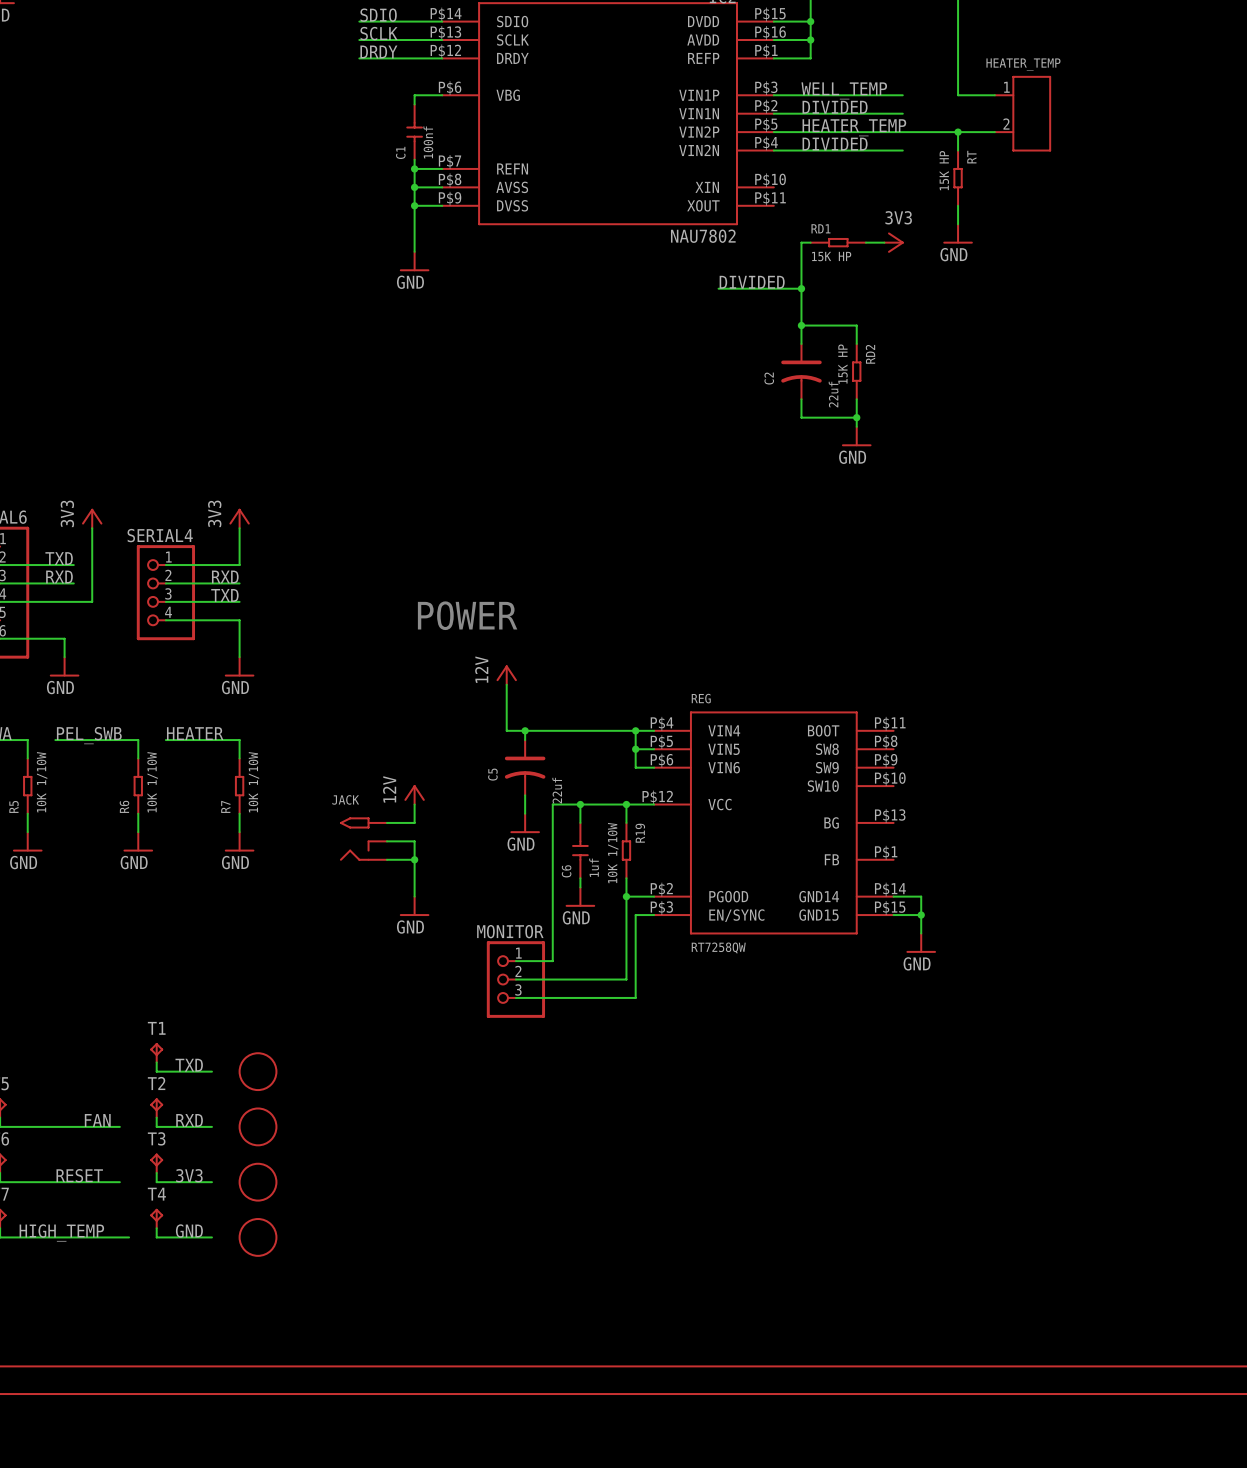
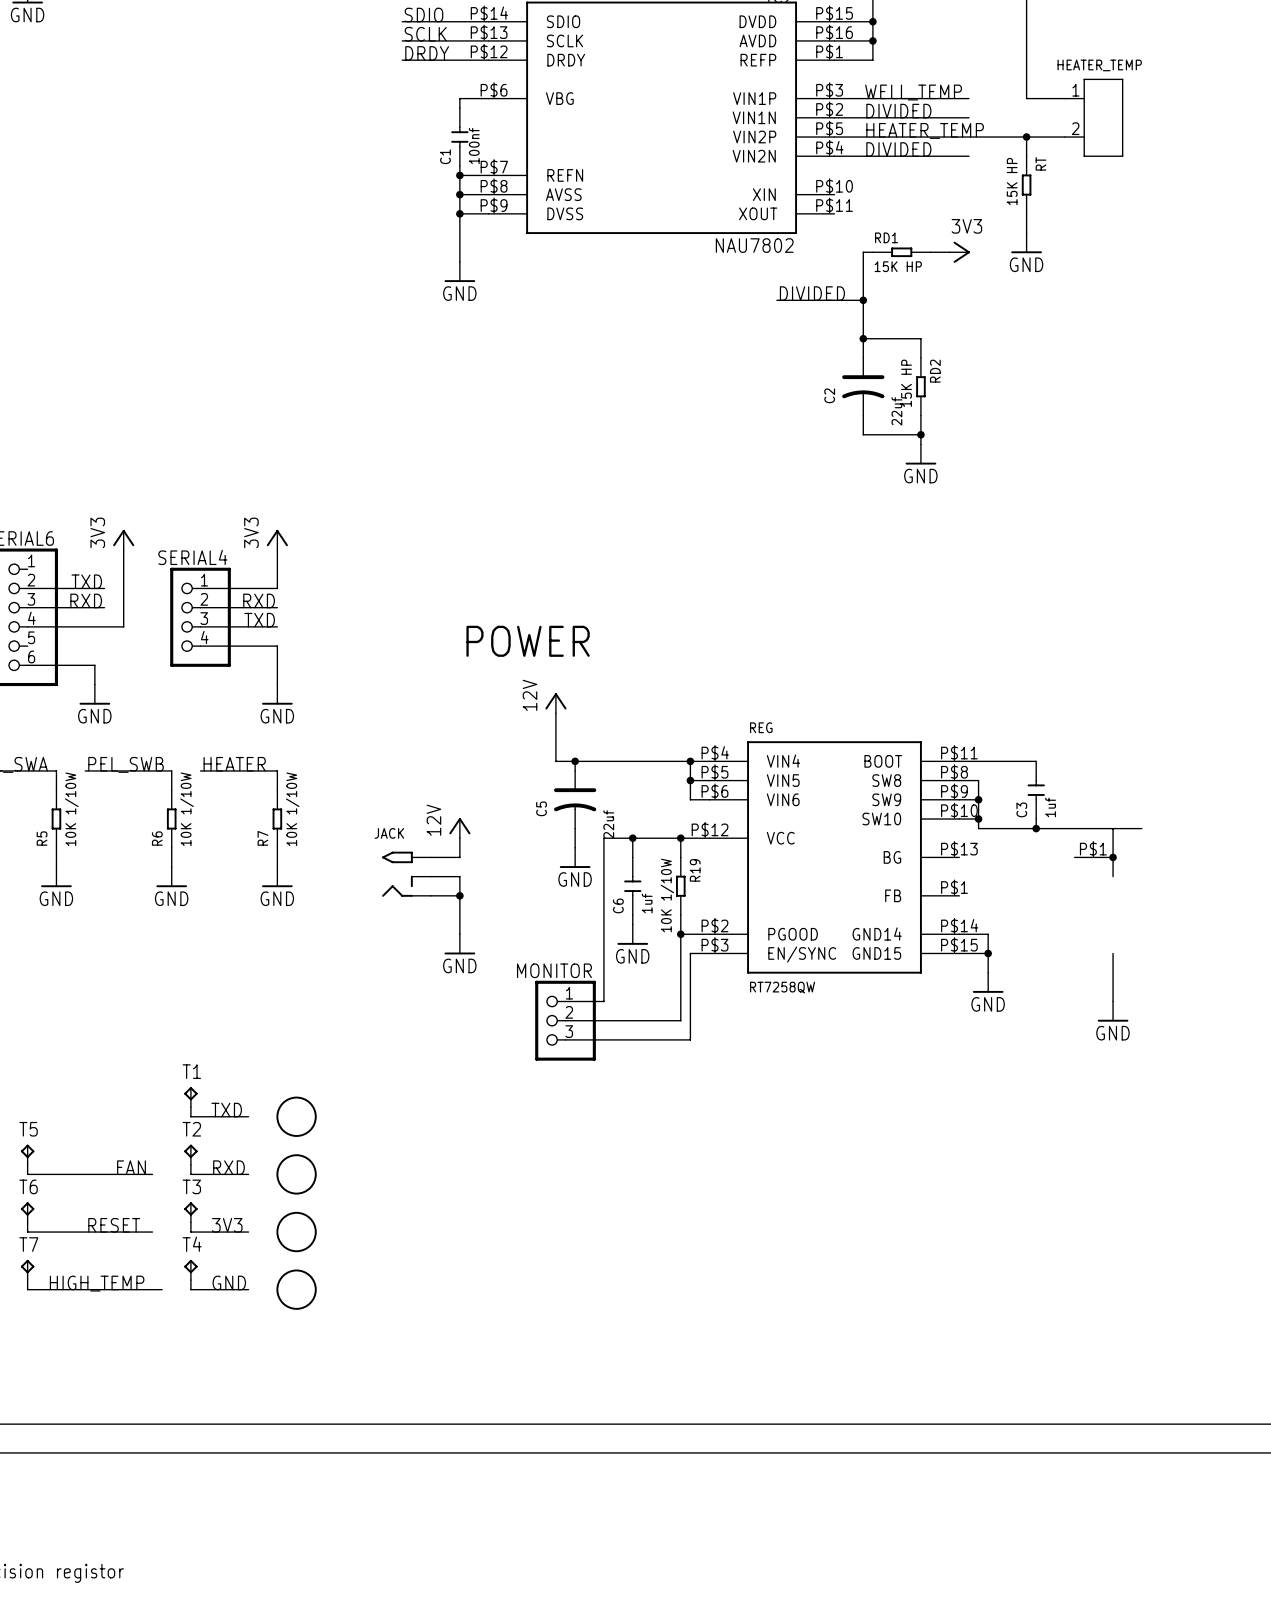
wire: none -> (959, 761) (1036, 761)
wire: none -> (959, 780) (978, 780) (978, 828) (1141, 828)
C3: none -> 1uf (1036, 790)
wire: none -> (959, 799) (978, 799)
junction: none -> (978, 799)
wire: none -> (959, 819) (978, 819)
junction: none -> (978, 819)
wire: none -> (1036, 819) (1036, 828)
junction: none -> (1036, 828)
wire: none -> (1113, 828) (1113, 876)
part: none -> (1084, 857)
wire: none -> (1093, 857) (1113, 857)
junction: none -> (1113, 857)
wire: none -> (1113, 953) (1113, 1001)
power symbol: none -> GND (1113, 1011)

